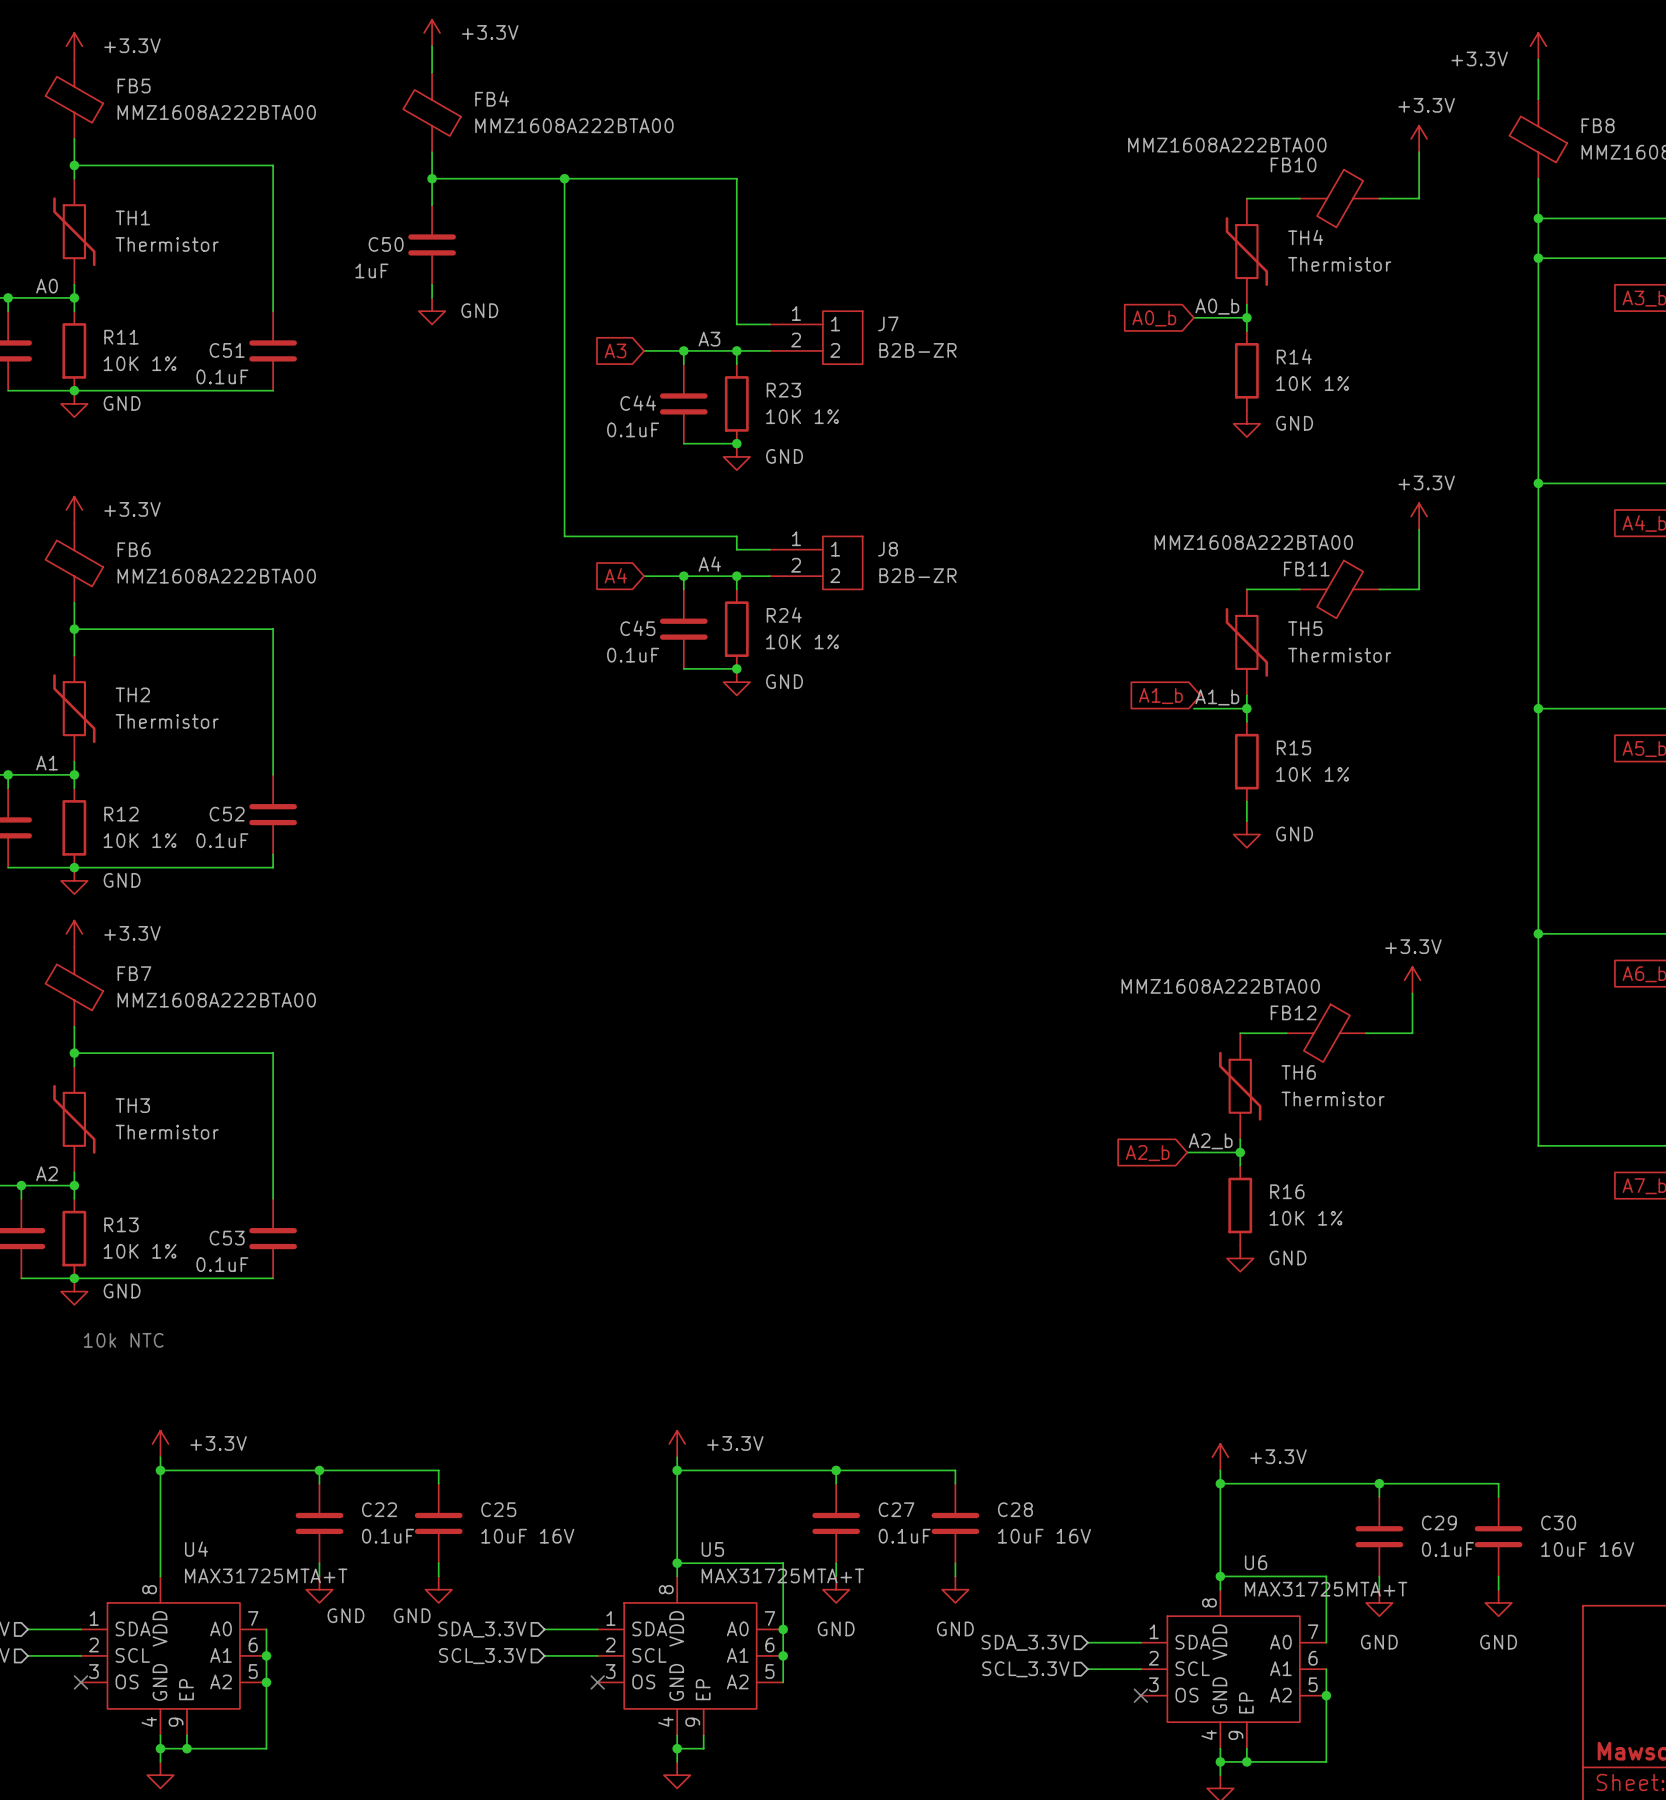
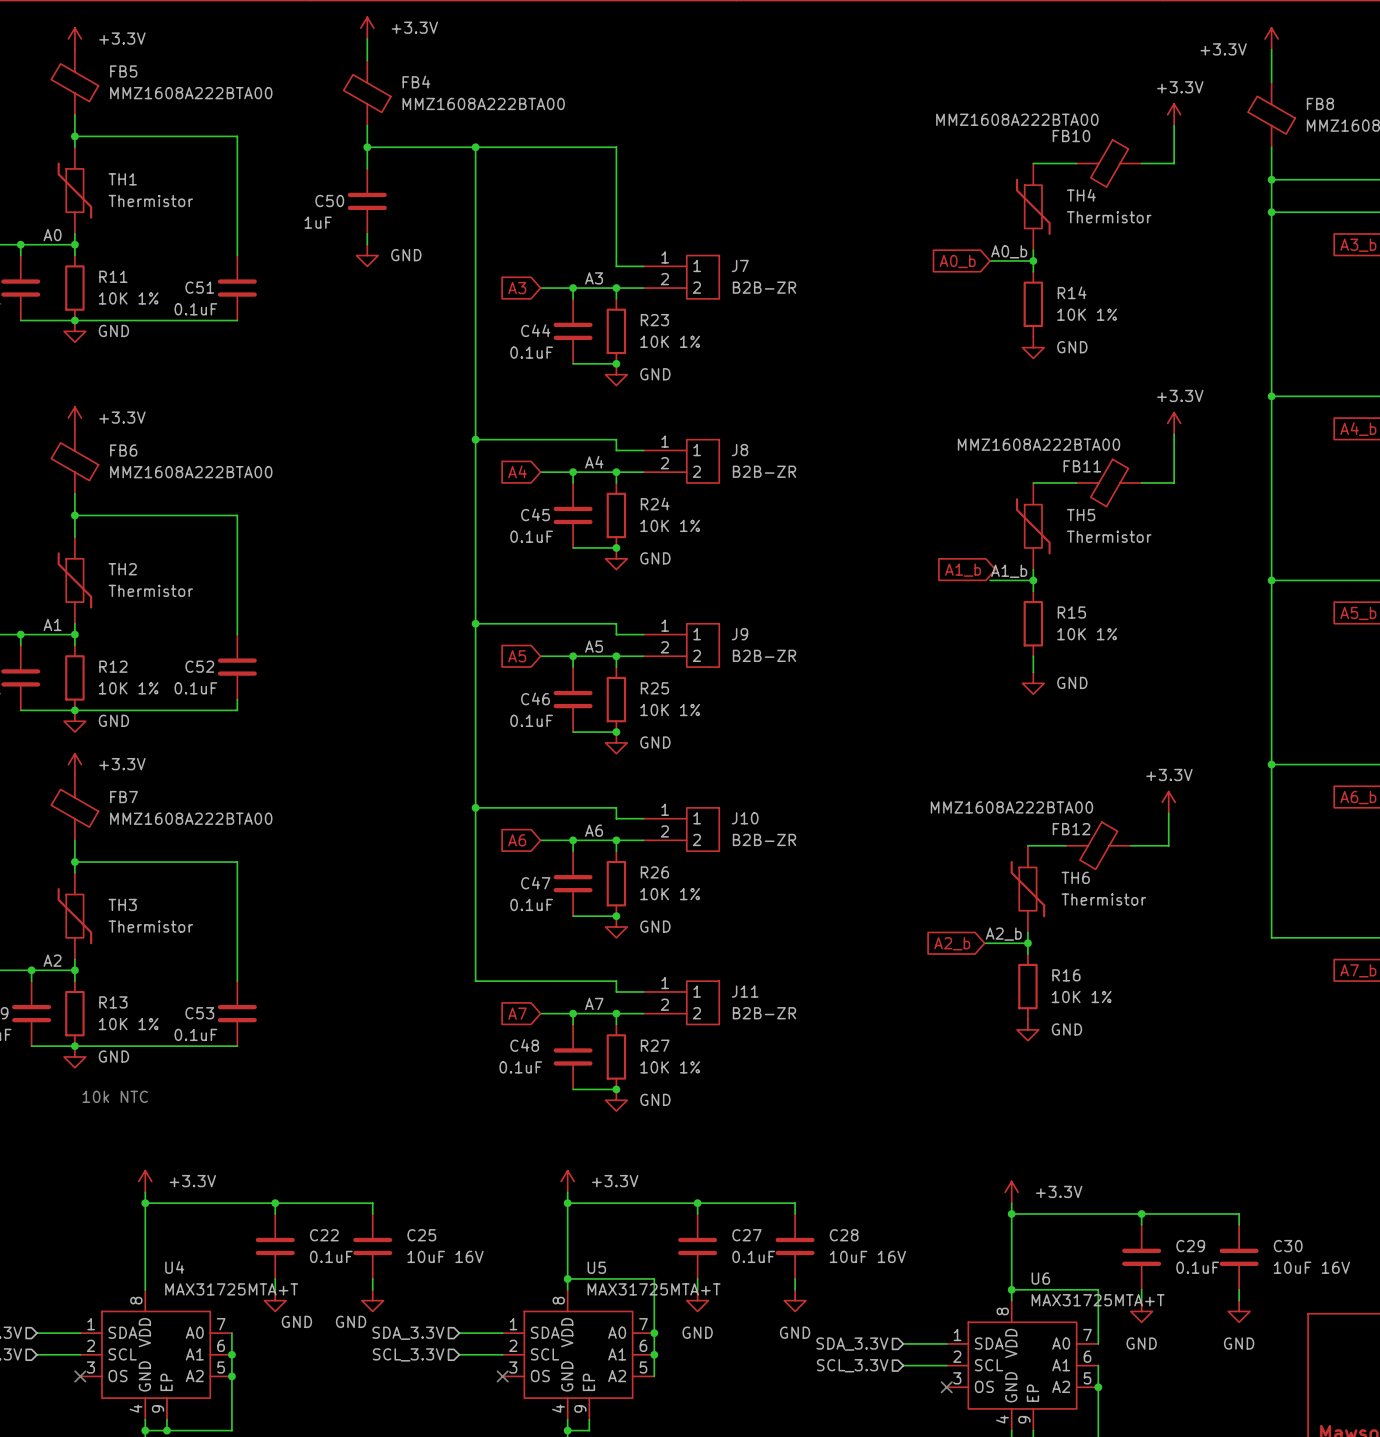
wire: none -> (475, 439) (475, 981) (616, 981) (616, 991) (643, 991)
junction: none -> (475, 439)
wire: none -> (475, 623) (616, 623) (616, 634) (643, 634)
junction: none -> (475, 623)
J9: none -> B2B-ZR (681, 645)
label: none -> A5 (594, 646)
global label: none -> A5 (517, 656)
wire: none -> (540, 656) (643, 656)
wire: none -> (573, 656) (573, 667)
junction: none -> (573, 656)
wire: none -> (616, 656) (616, 667)
junction: none -> (616, 656)
C46: none -> 0.1uF (573, 699)
R25: none -> 10K 1% (616, 699)
wire: none -> (573, 732) (616, 732)
junction: none -> (616, 732)
power symbol: none -> GND (616, 742)
wire: none -> (475, 807) (616, 807) (616, 818) (643, 818)
junction: none -> (475, 807)
J10: none -> B2B-ZR (681, 829)
label: none -> A6 (594, 830)
global label: none -> A6 (517, 840)
wire: none -> (540, 840) (643, 840)
wire: none -> (573, 840) (573, 851)
junction: none -> (573, 840)
wire: none -> (616, 840) (616, 851)
junction: none -> (616, 840)
C47: none -> 0.1uF (573, 883)
R26: none -> 10K 1% (616, 883)
wire: none -> (573, 916) (616, 916)
junction: none -> (616, 916)
power symbol: none -> GND (616, 927)
J11: none -> B2B-ZR (681, 1002)
label: none -> A7 (594, 1003)
global label: none -> A7 (517, 1013)
wire: none -> (540, 1013) (643, 1013)
wire: none -> (573, 1013) (573, 1024)
junction: none -> (573, 1013)
wire: none -> (616, 1013) (616, 1024)
junction: none -> (616, 1013)
C48: none -> 0.1uF (573, 1056)
R27: none -> 10K 1% (616, 1056)
wire: none -> (573, 1089) (616, 1089)
junction: none -> (616, 1089)
power symbol: none -> GND (616, 1100)

